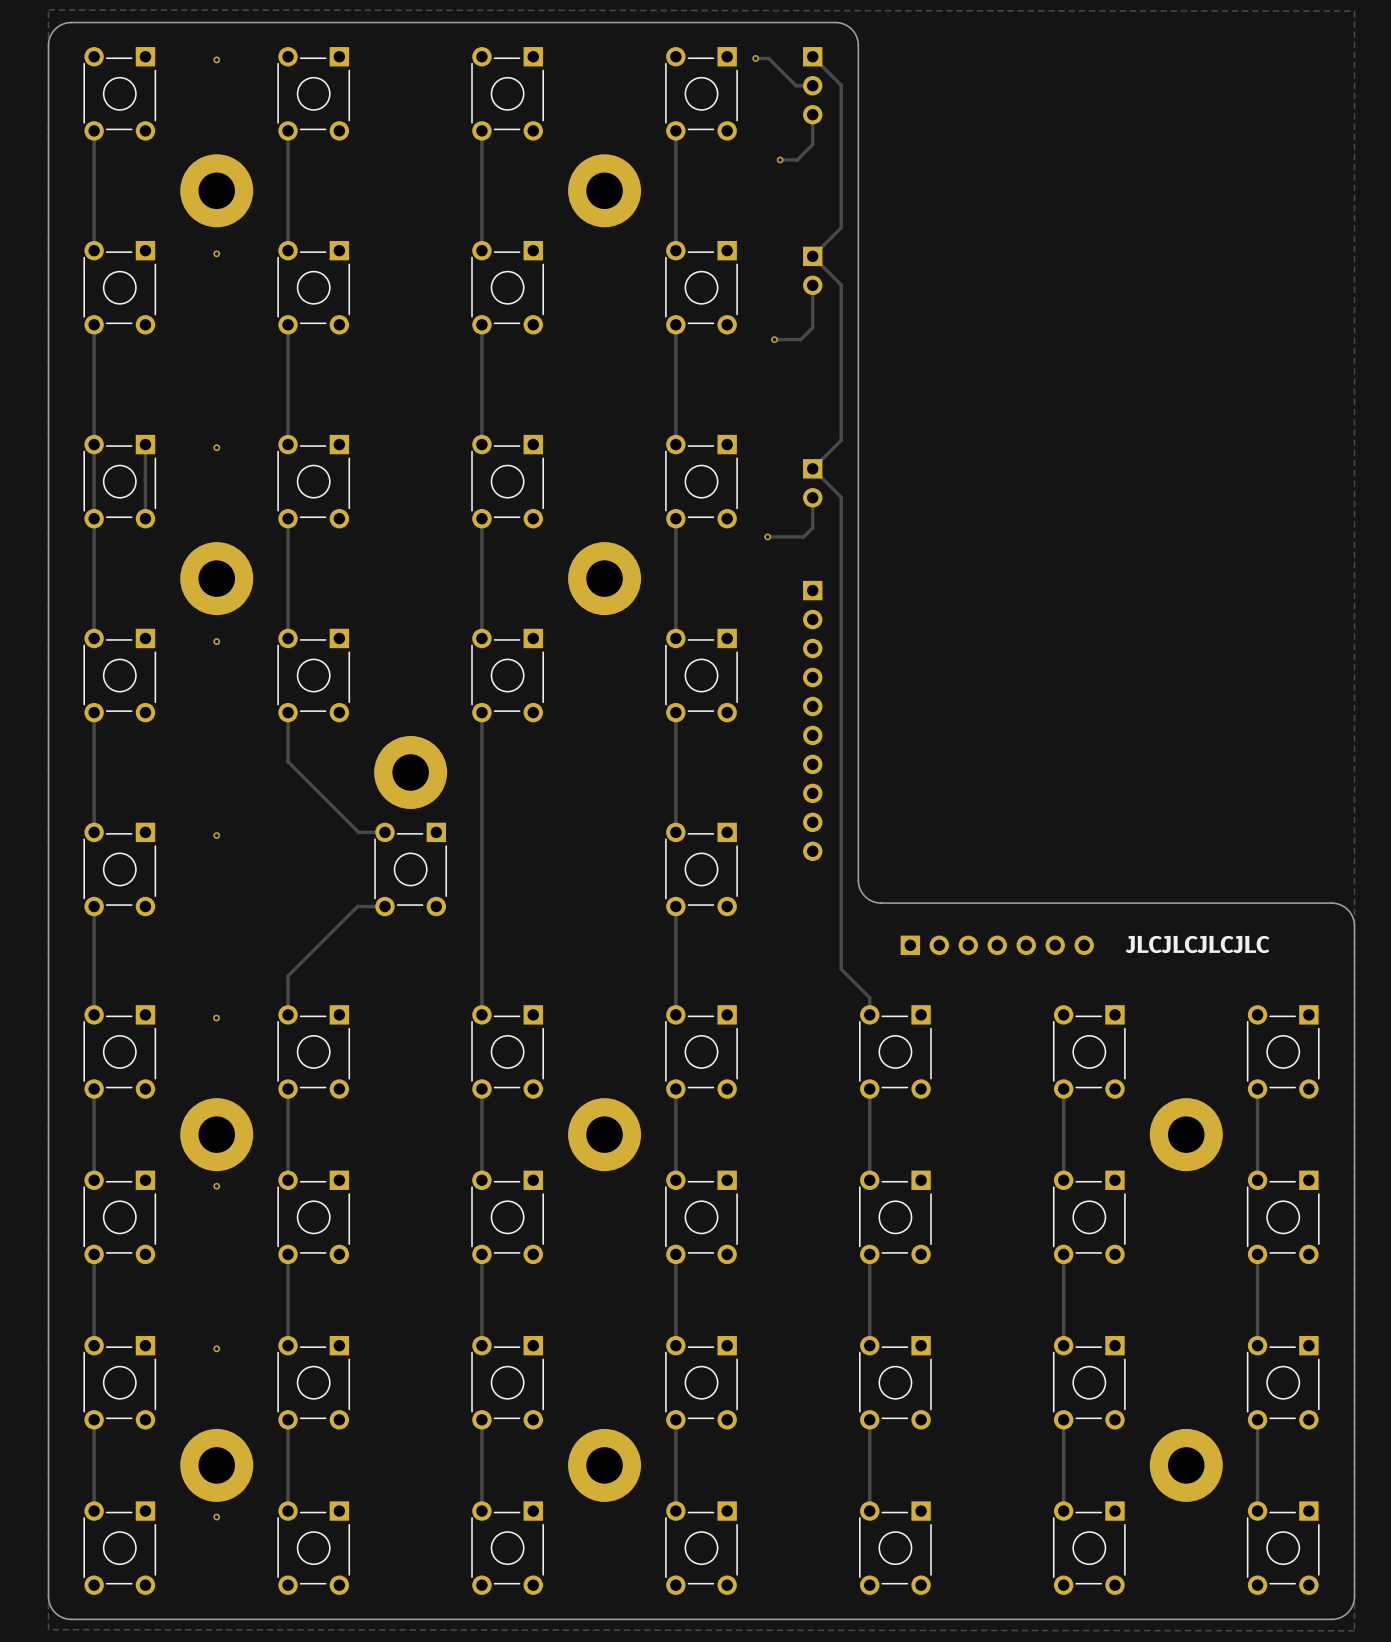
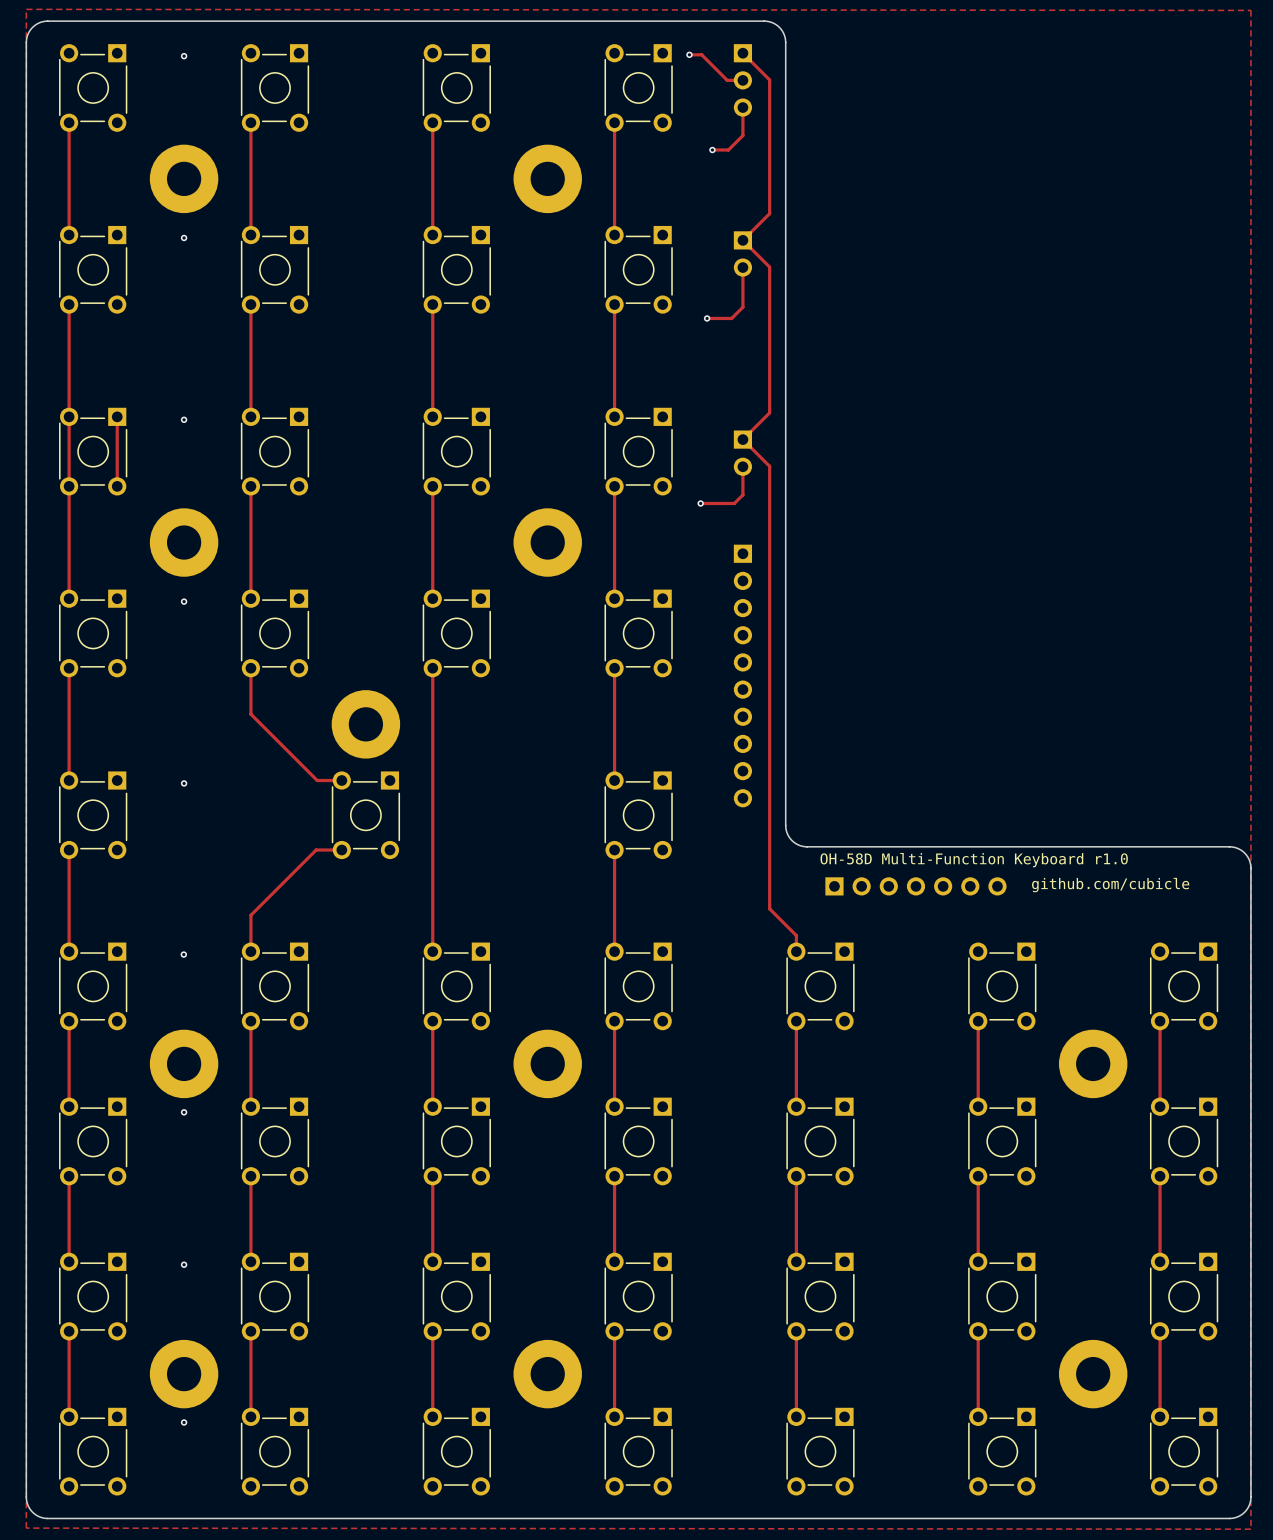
text: none -> OH-58D Multi-Function Keyboard r1.0 (974, 860)
text: JLCJLCJLCJLC (1197, 944) -> github.com/cubicle (1110, 885)

